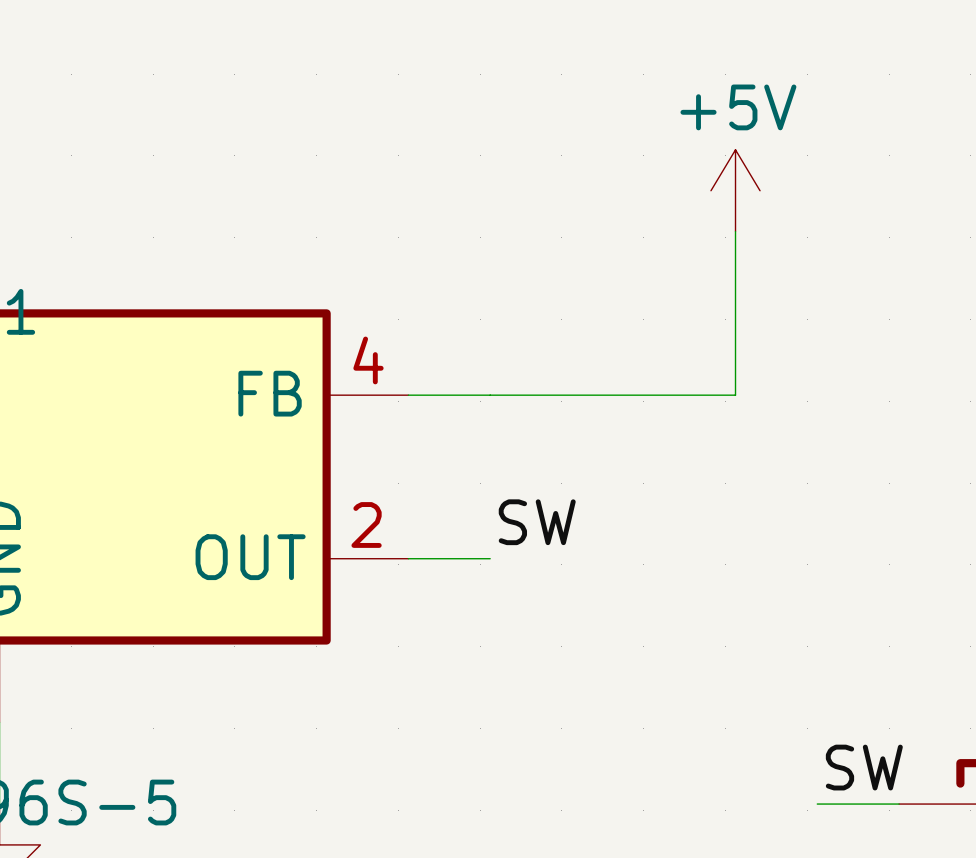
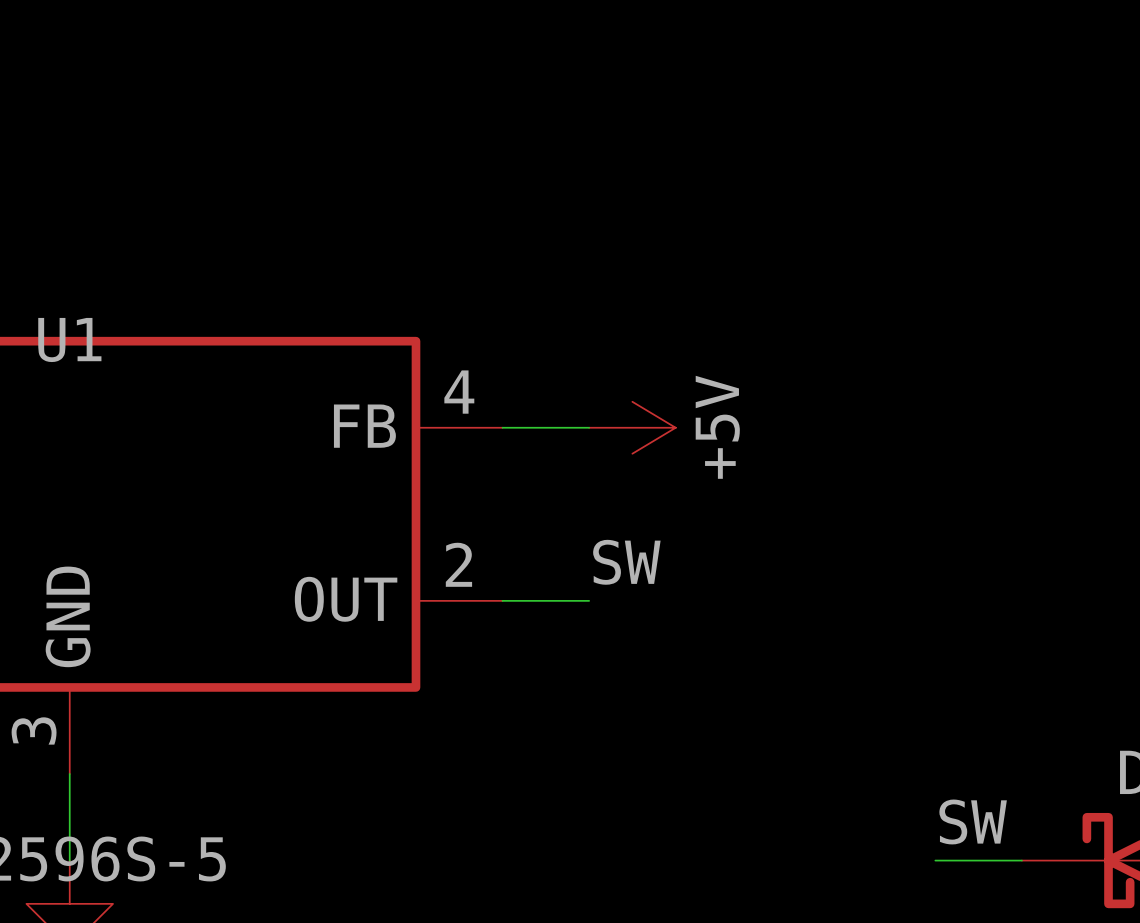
power symbol rotation: 0° (735, 190) -> 90° clockwise (632, 427)
power symbol position: +5V (735, 190) -> +5V (632, 427)
wire: (735, 231) (735, 395) (490, 395) -> none

